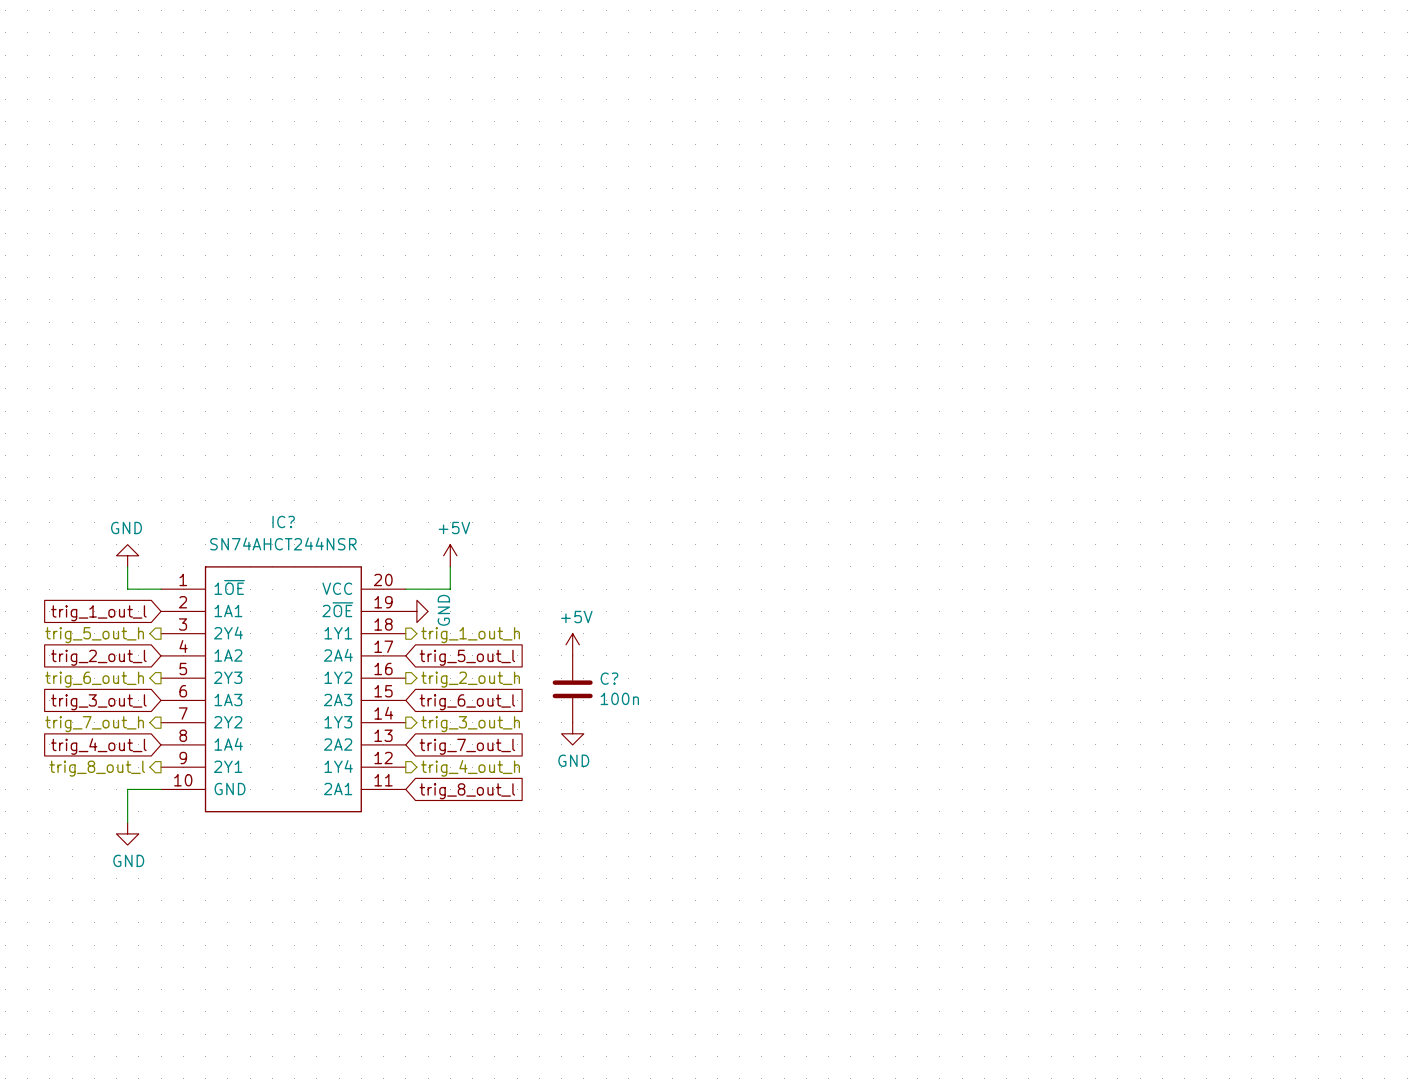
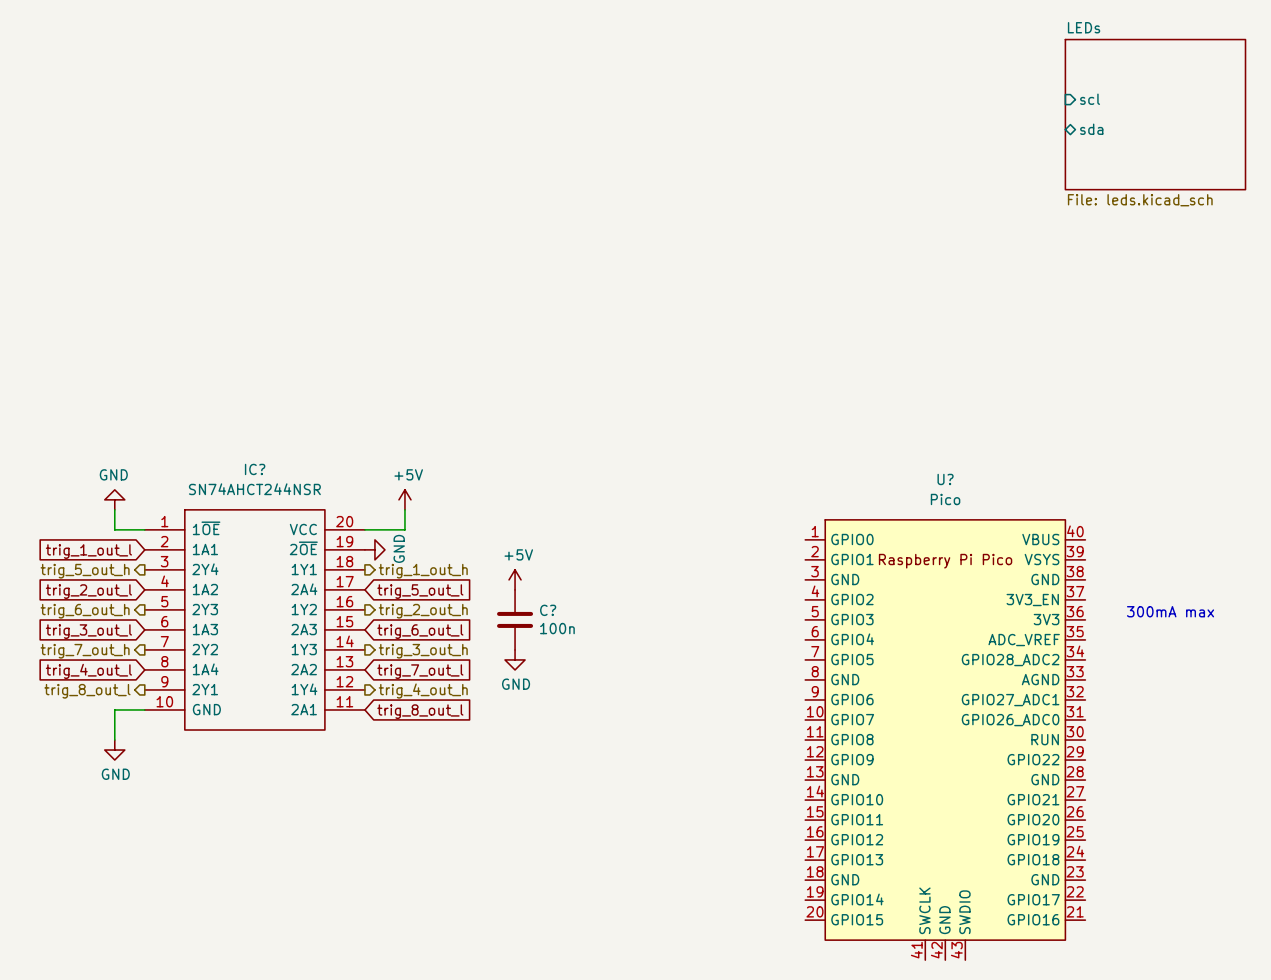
sheet pin: none -> scl (1090, 99)
sheet LEDs: none -> File: leds.kicad_sch (1155, 114)
sheet pin: none -> sda (1091, 129)
text: none -> 300mA max (1170, 611)
U?: none -> Pico (945, 740)

